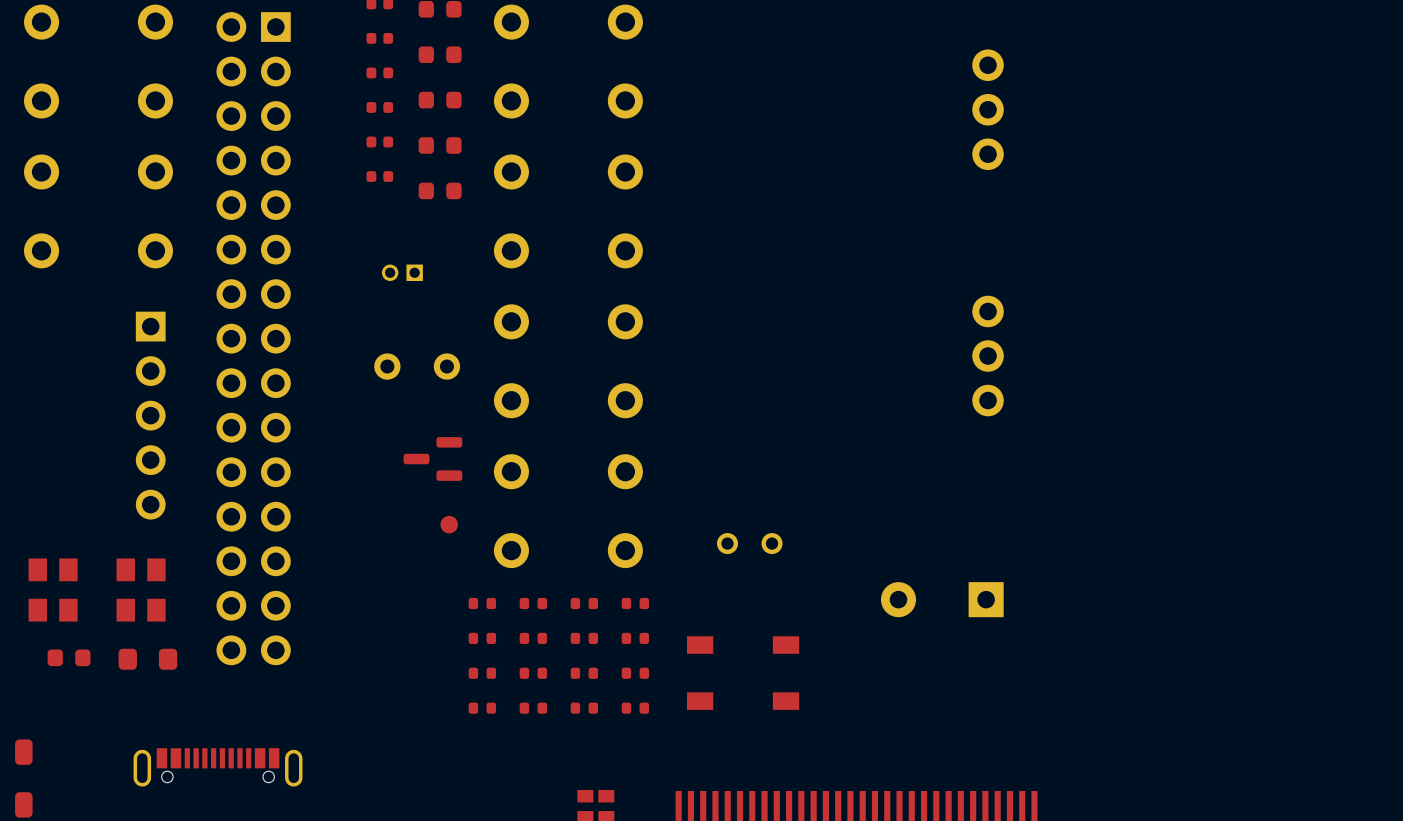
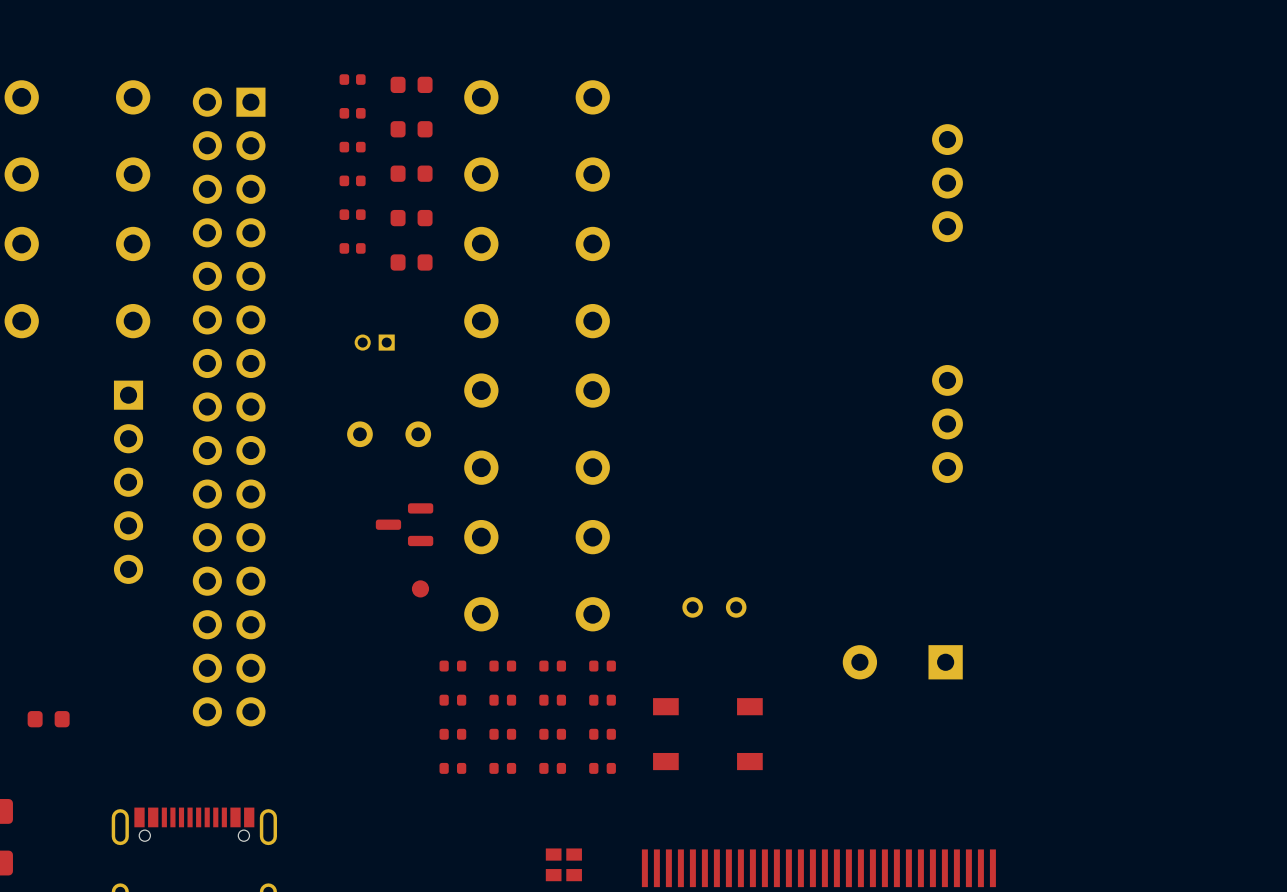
part: (53, 590) -> none
part: (141, 590) -> none
part: (147, 659) -> none

